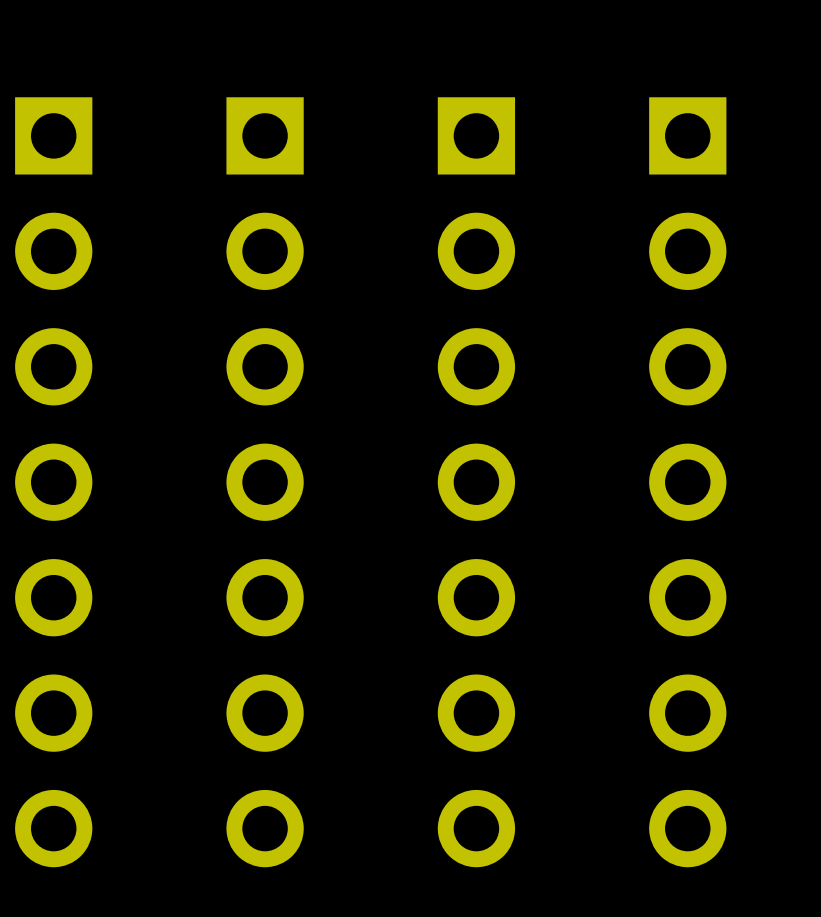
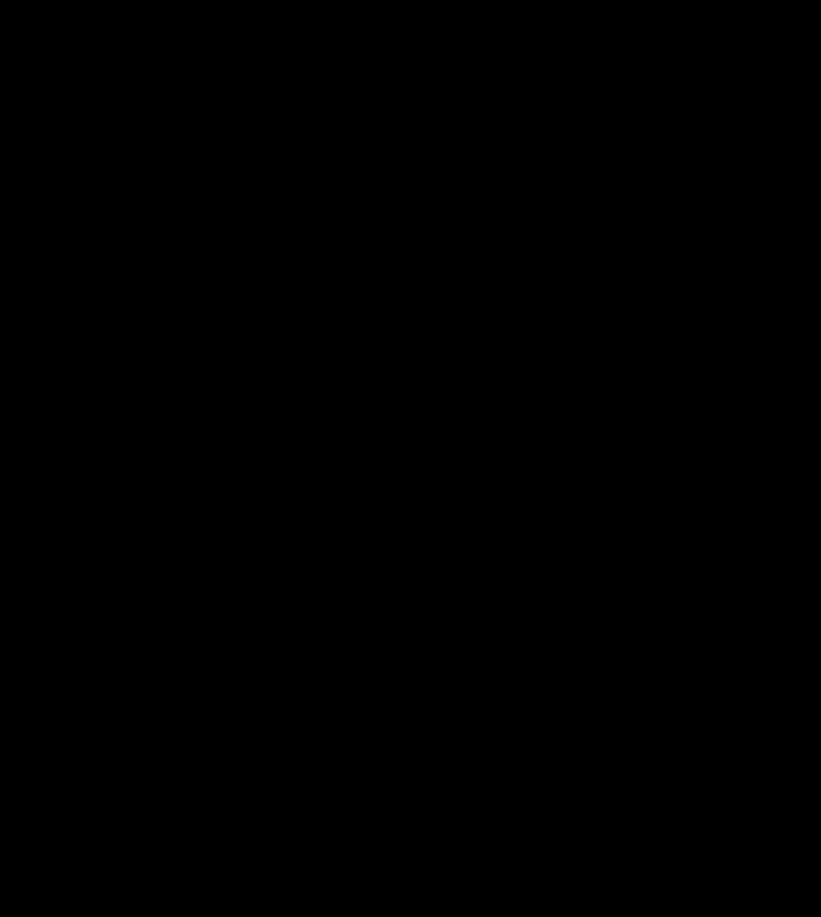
part: (53, 482) -> none
part: (265, 482) -> none
part: (476, 482) -> none
part: (687, 482) -> none

